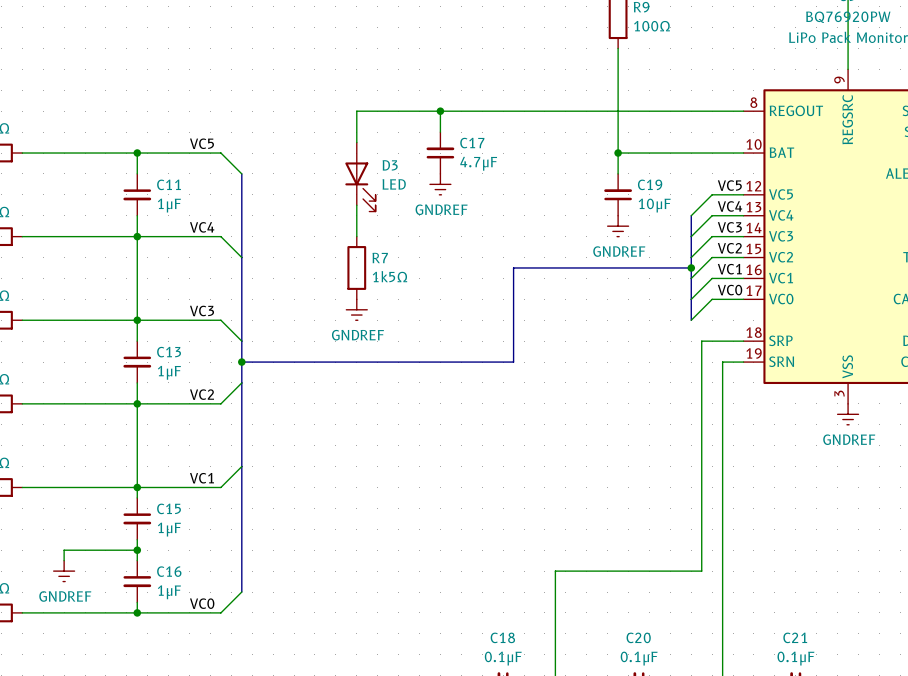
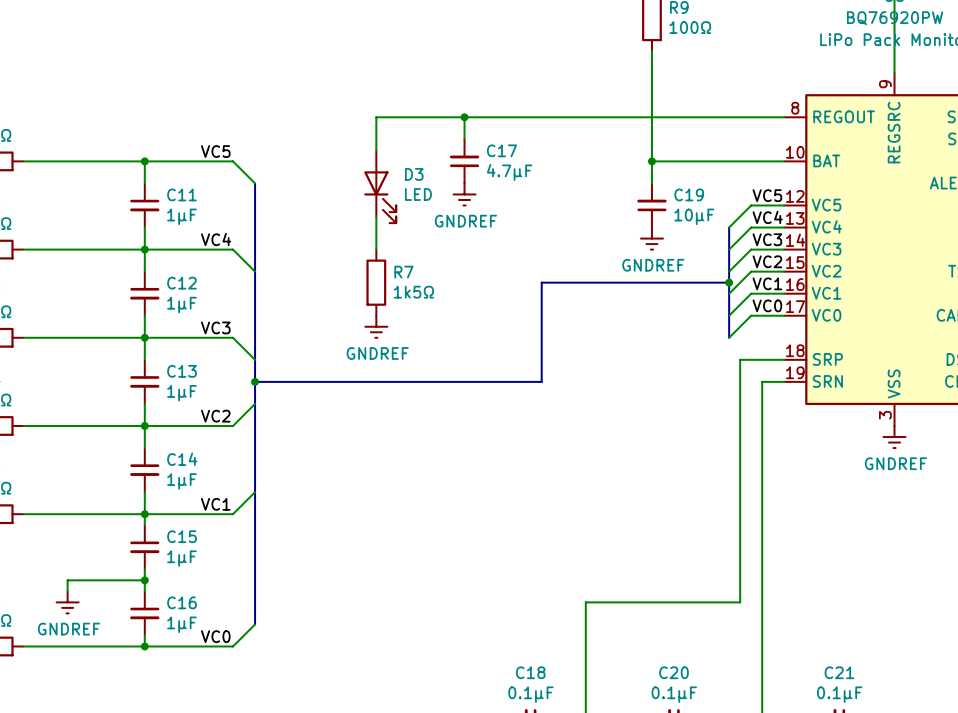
C12: none -> 1μF (144, 293)
C14: none -> 1μF (144, 470)

